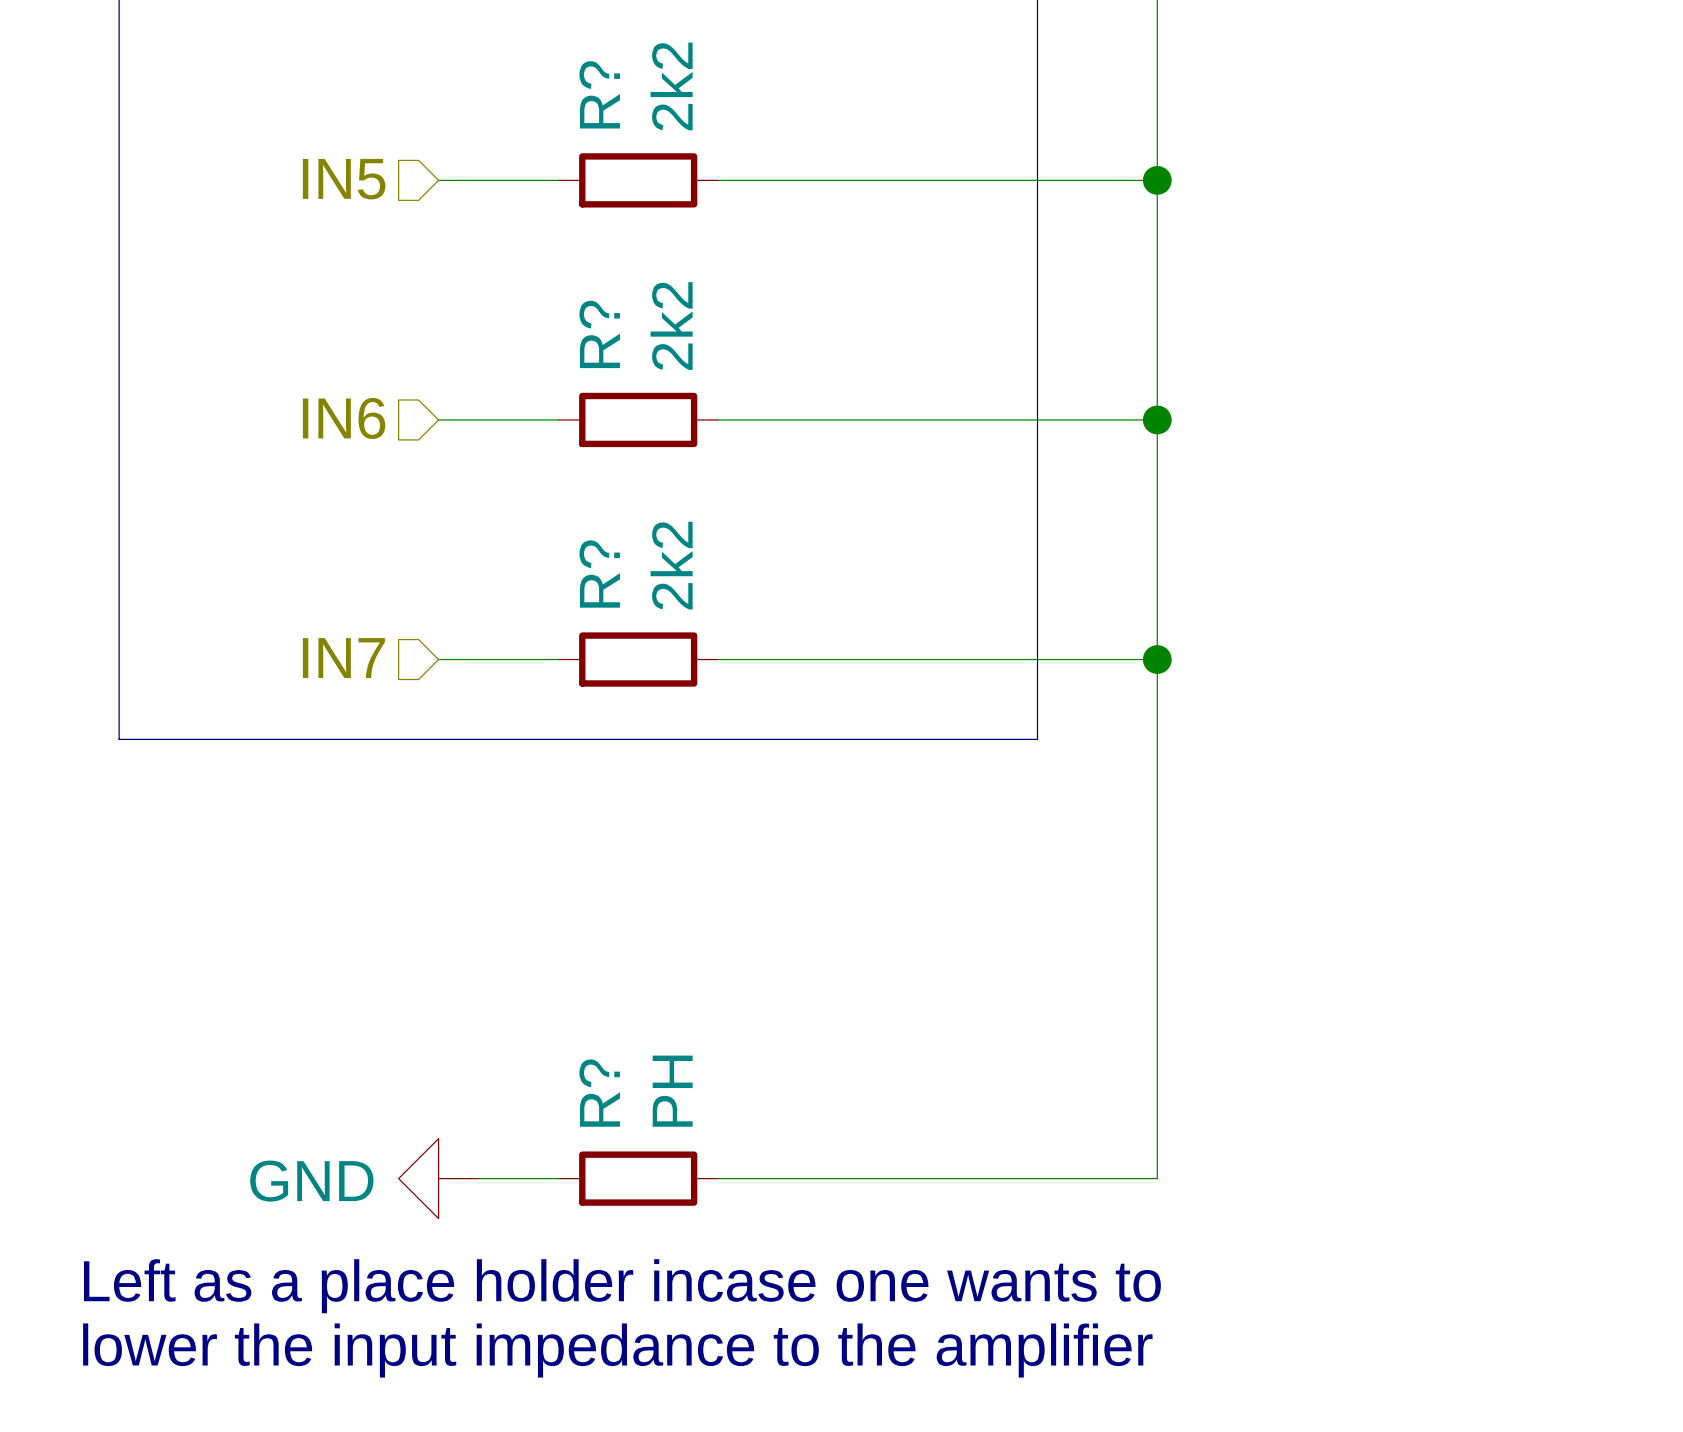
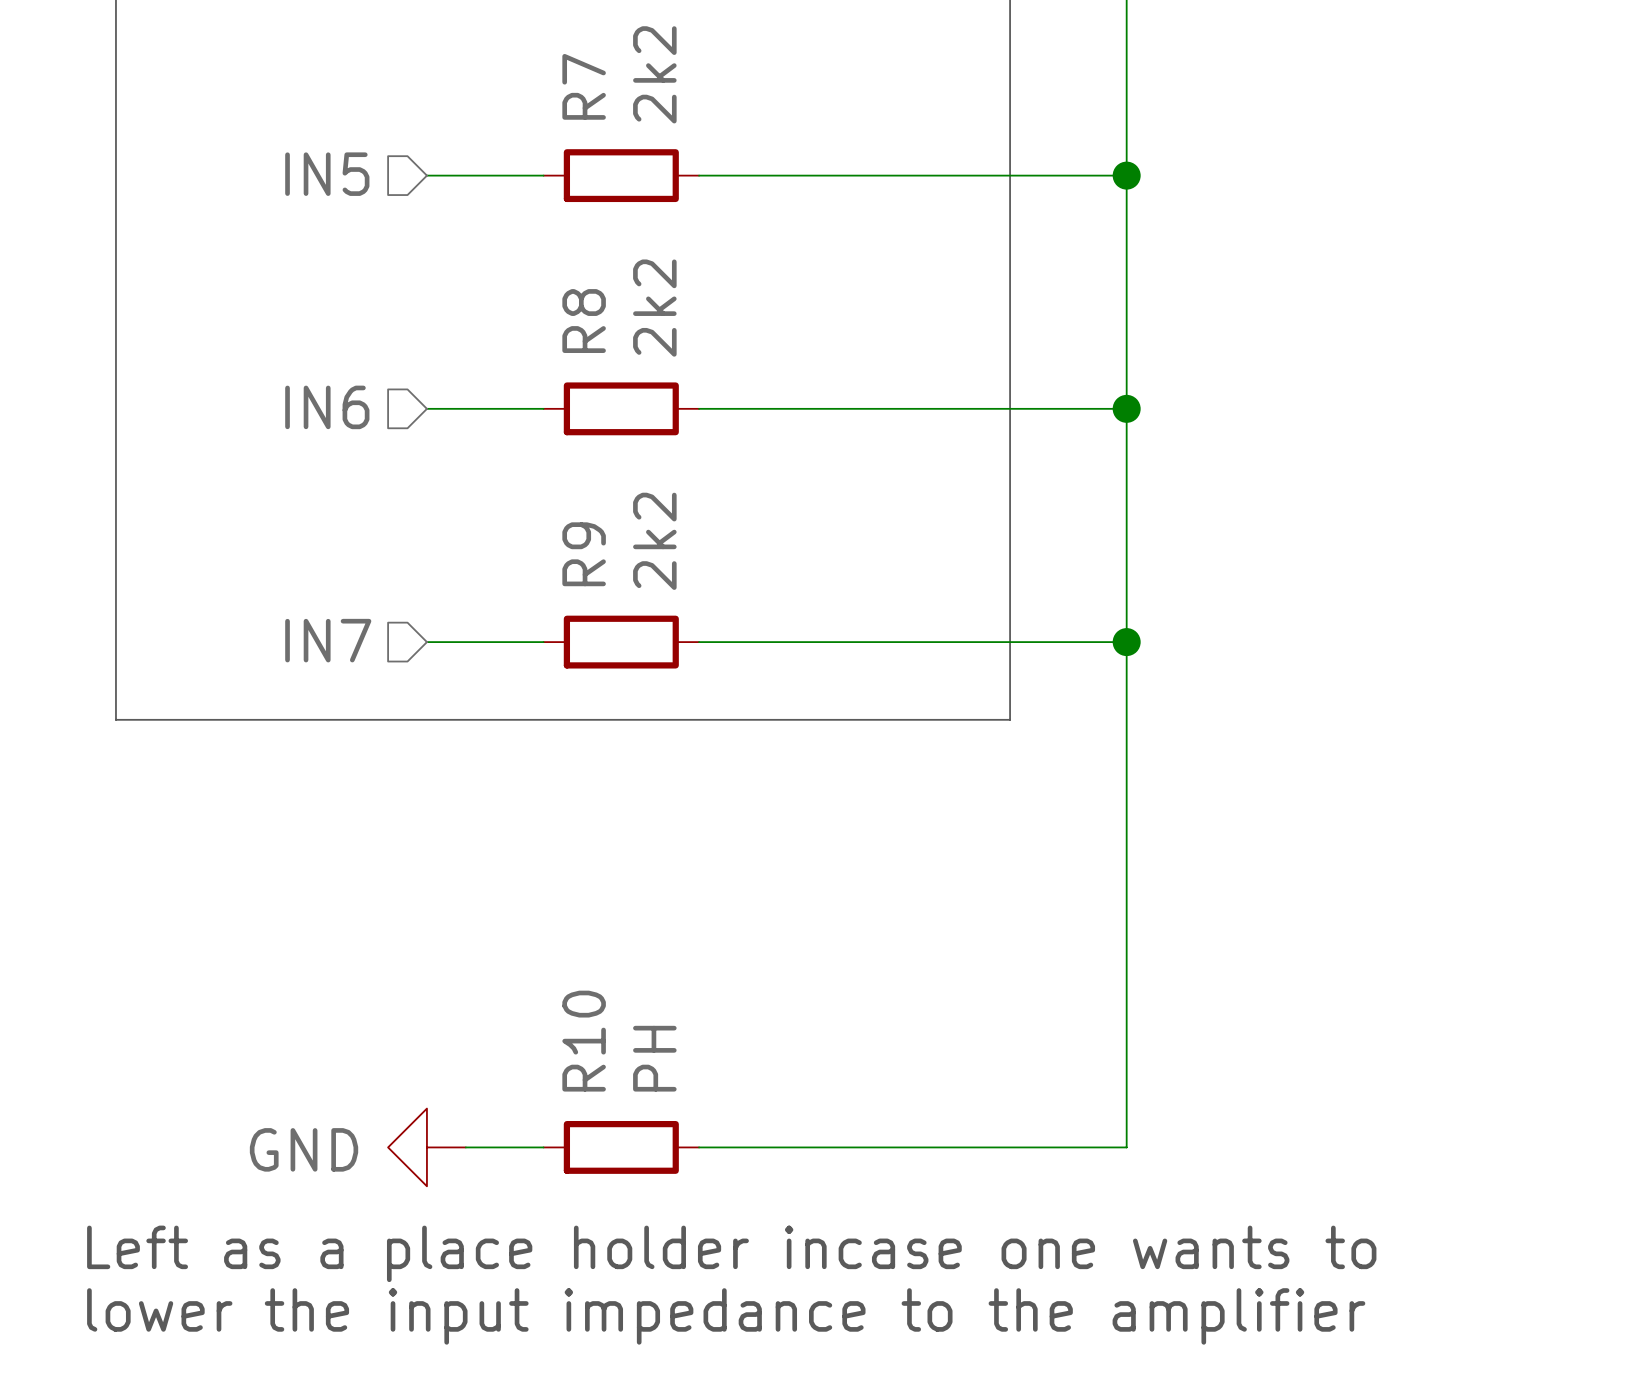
R? name: R? (599, 94) -> R7 (584, 86)
R? name: R? (599, 334) -> R8 (584, 321)
R? name: R? (599, 574) -> R9 (584, 554)
R? name: R? (599, 1093) -> R10 (584, 1041)

